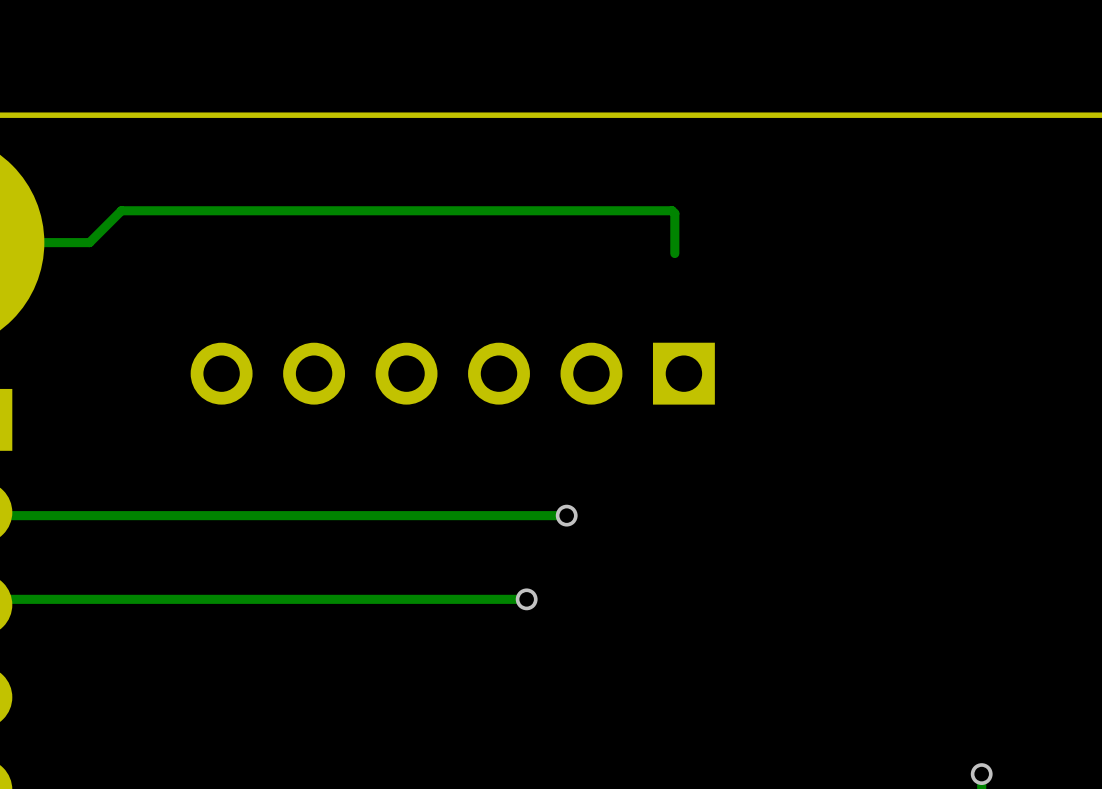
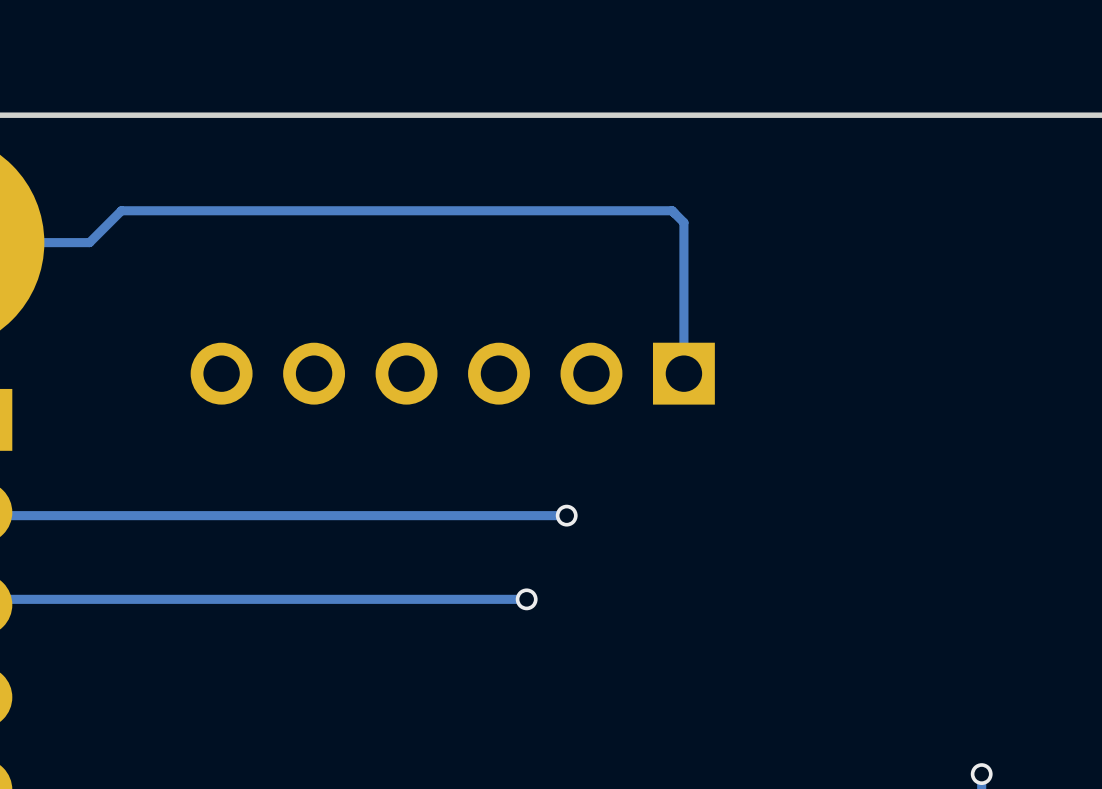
track: (674, 213) (674, 253) -> (674, 213) (683, 222) (683, 373)

